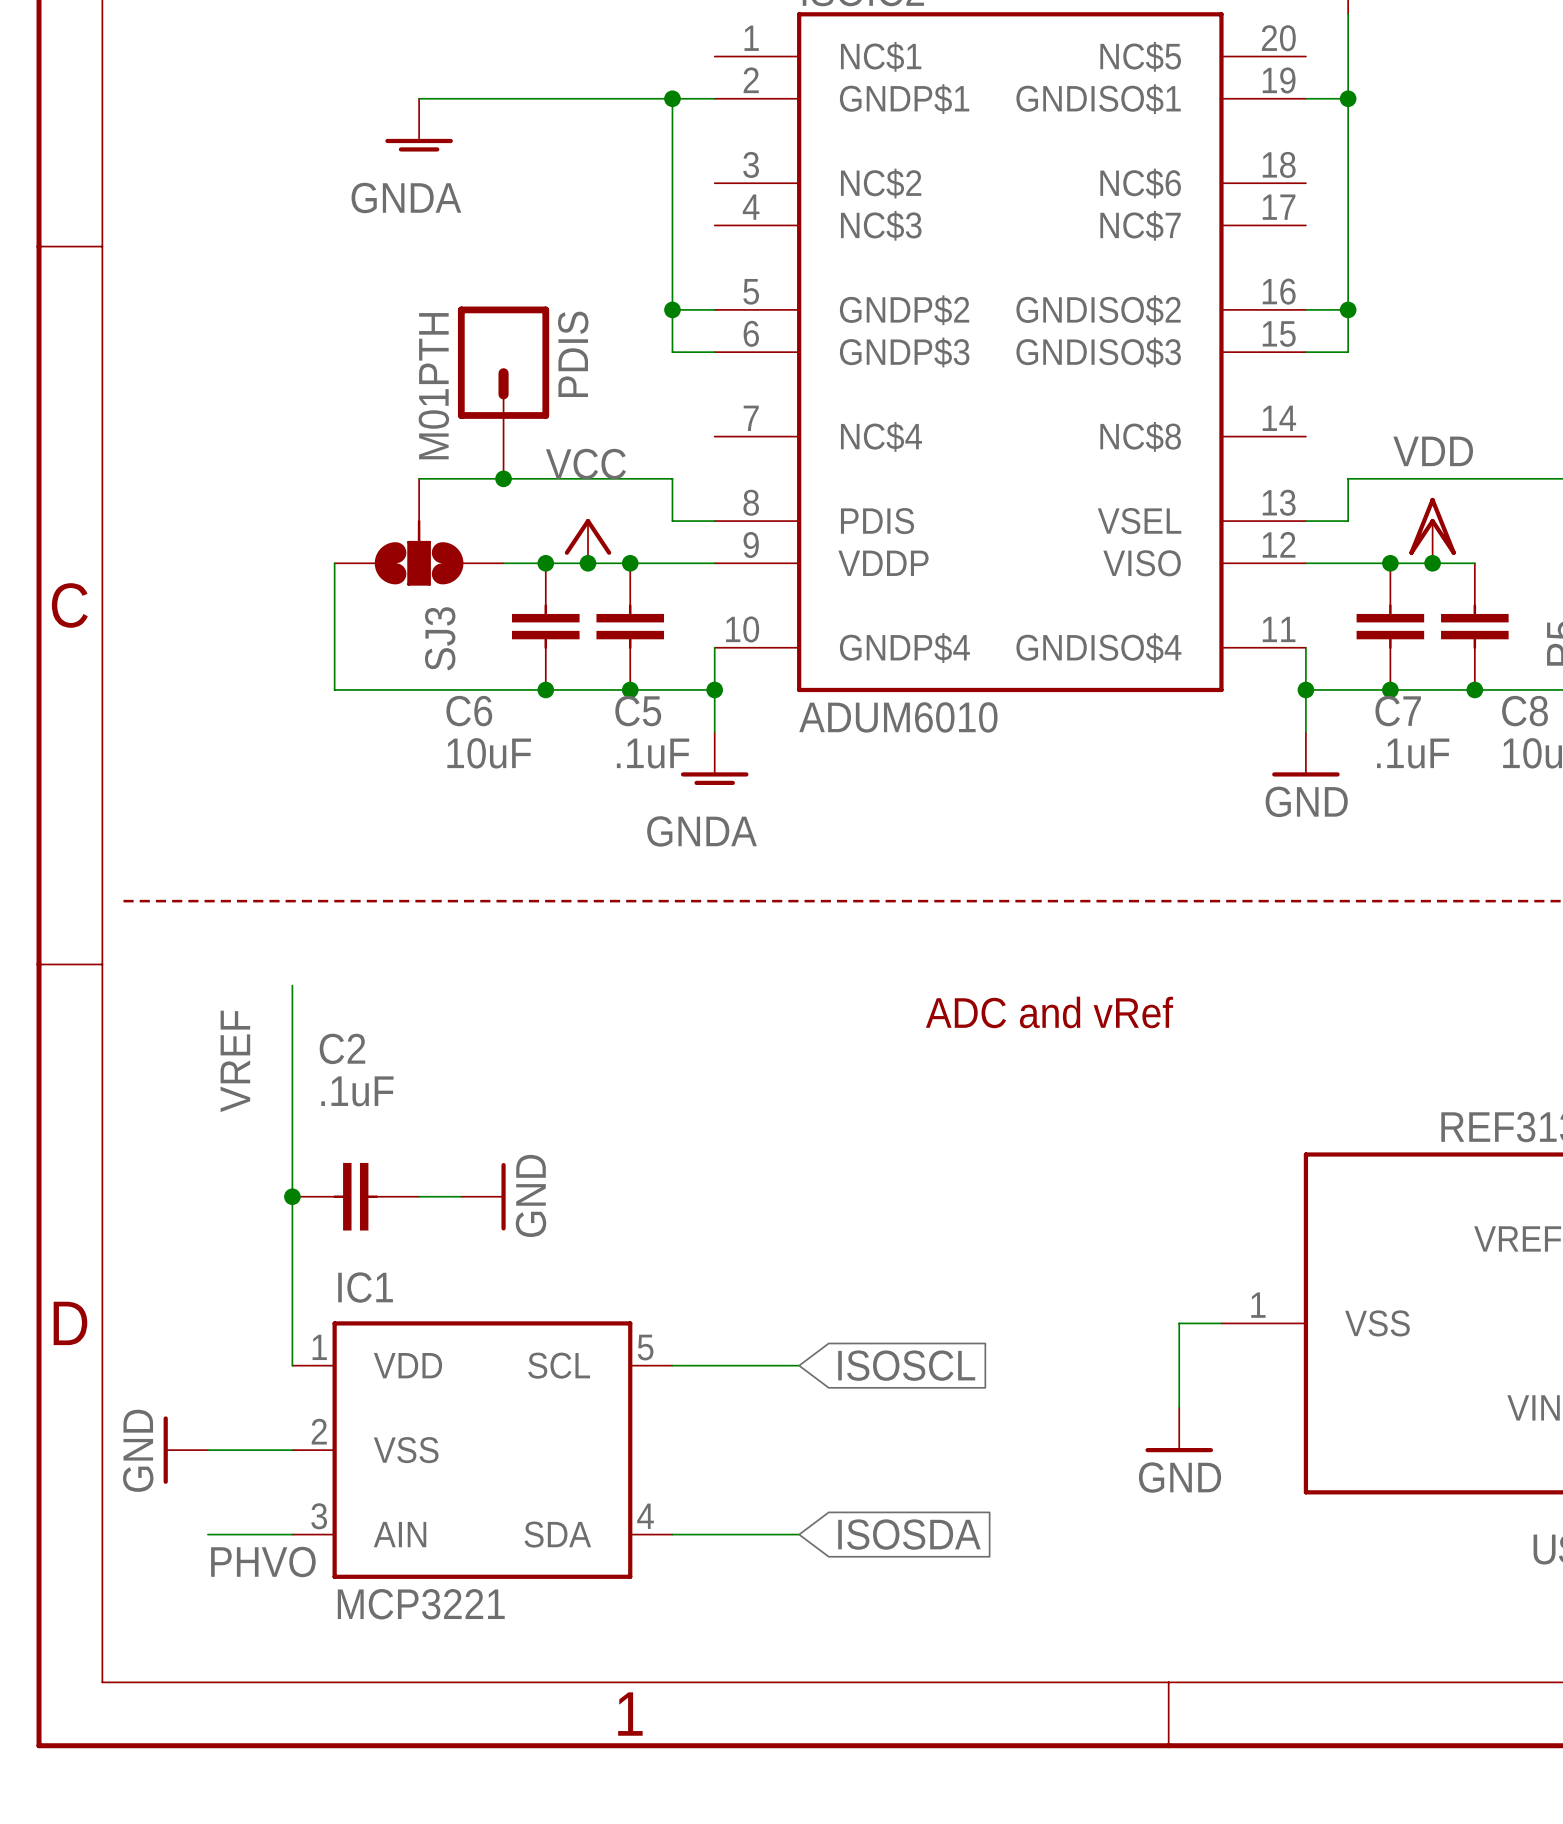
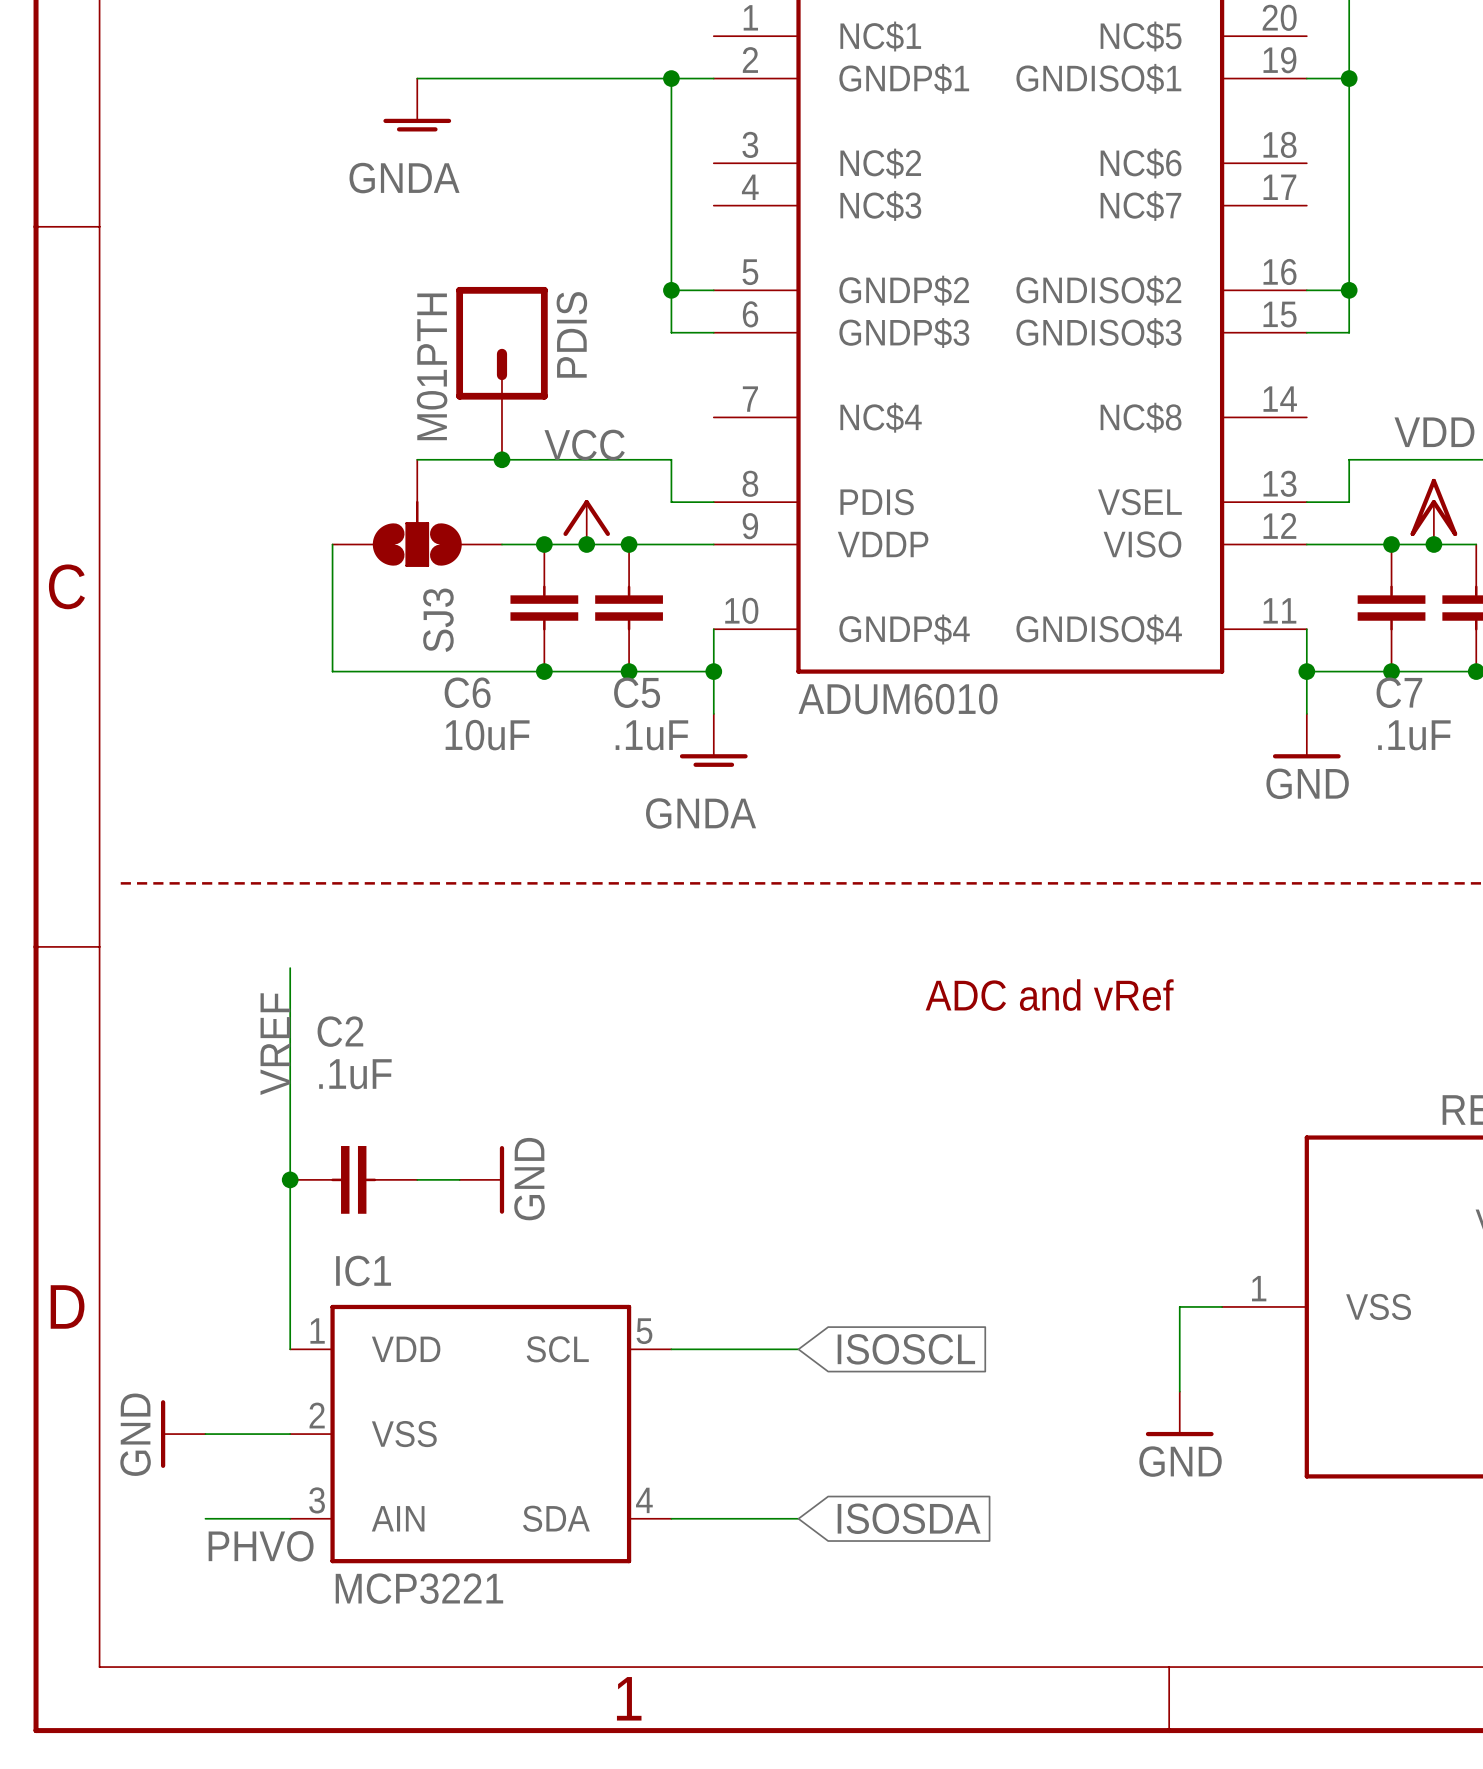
label position: VREF (235, 1061) -> VREF (275, 1044)

